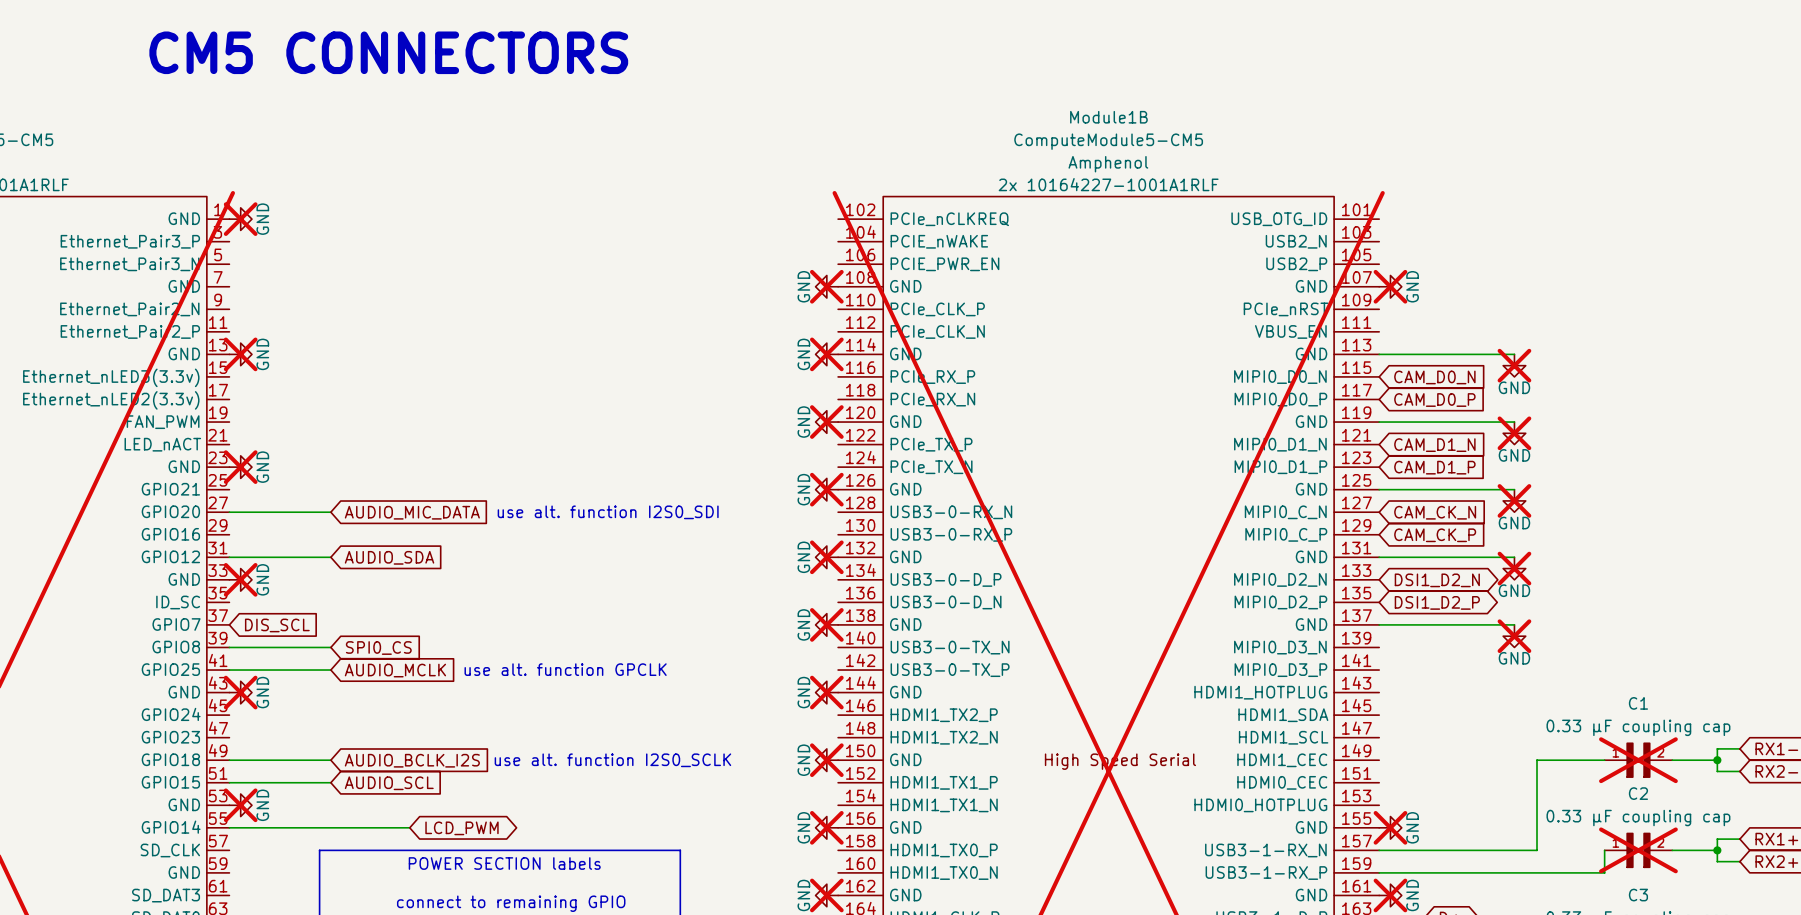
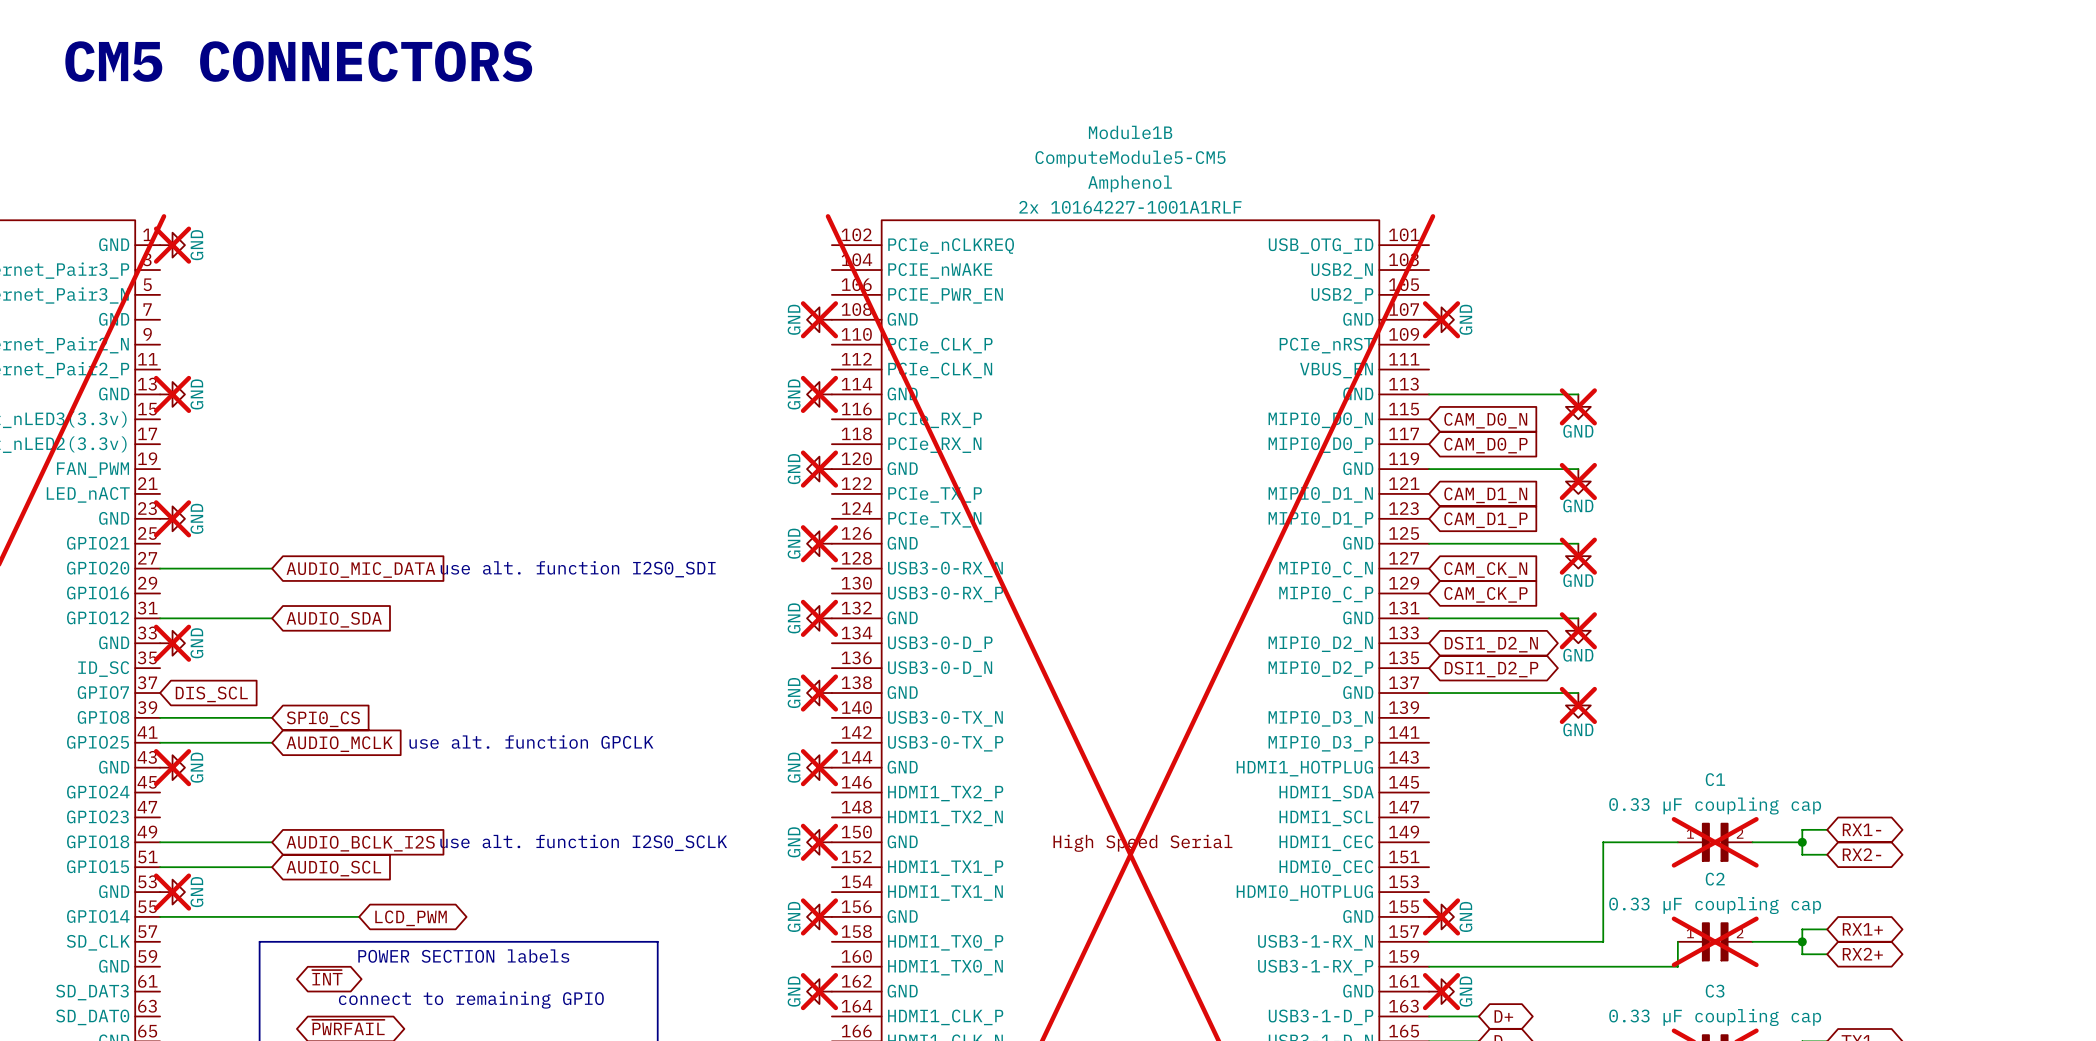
global label: none -> ~{INT} (327, 977)

